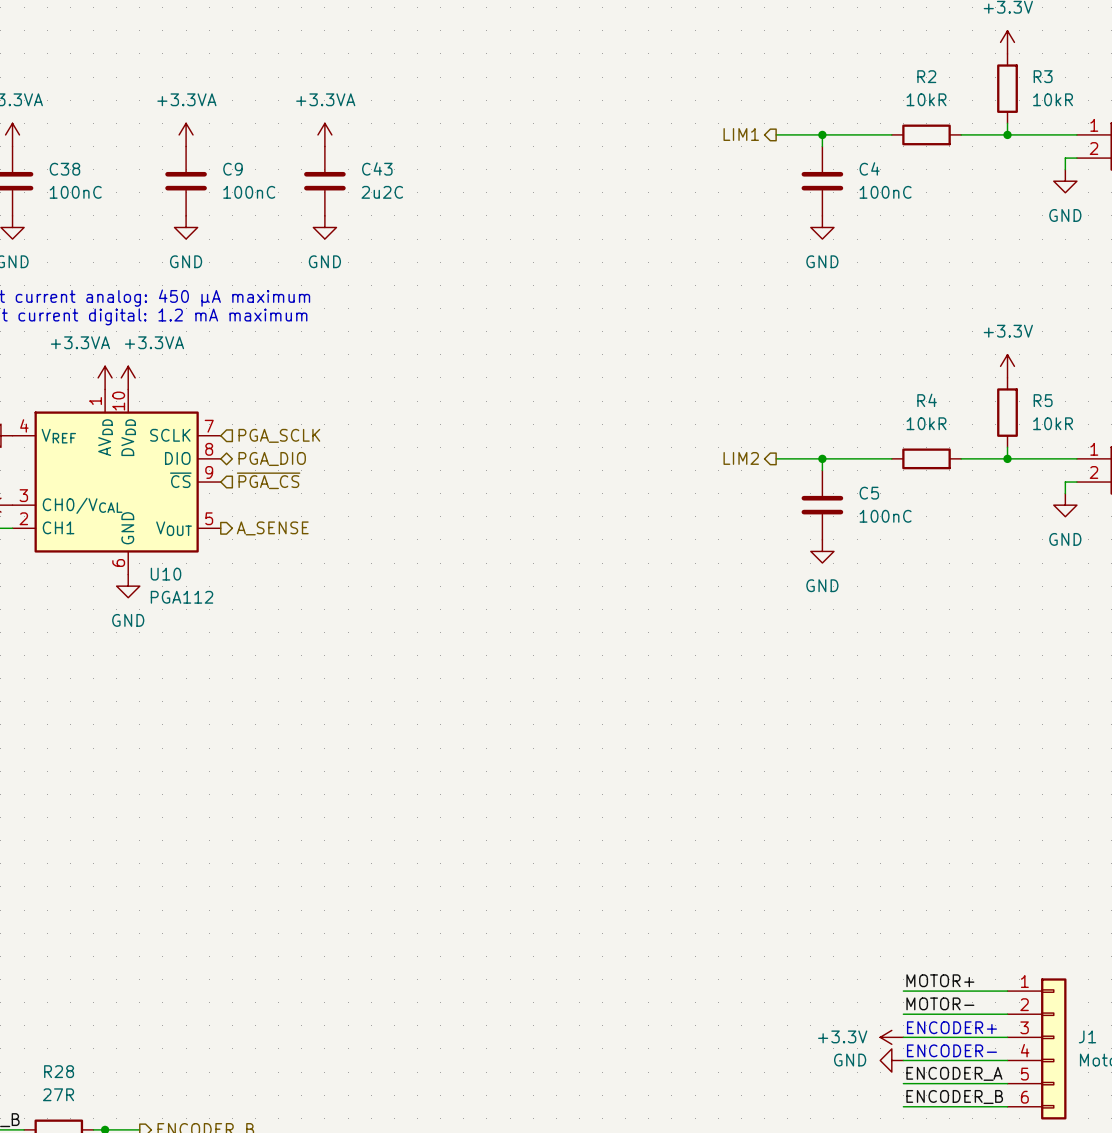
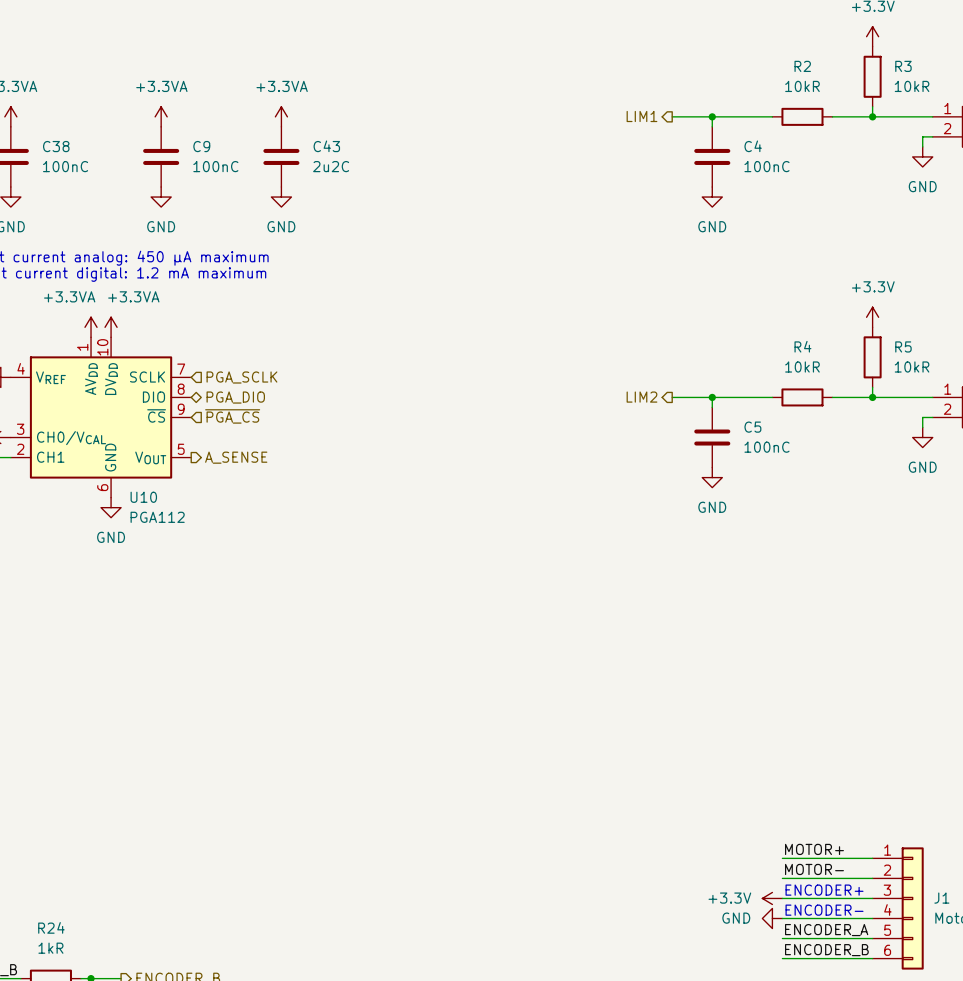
R28 name: R28 (59, 1071) -> R24 (51, 927)
R28 value: 27R (58, 1094) -> 1kR (50, 948)

